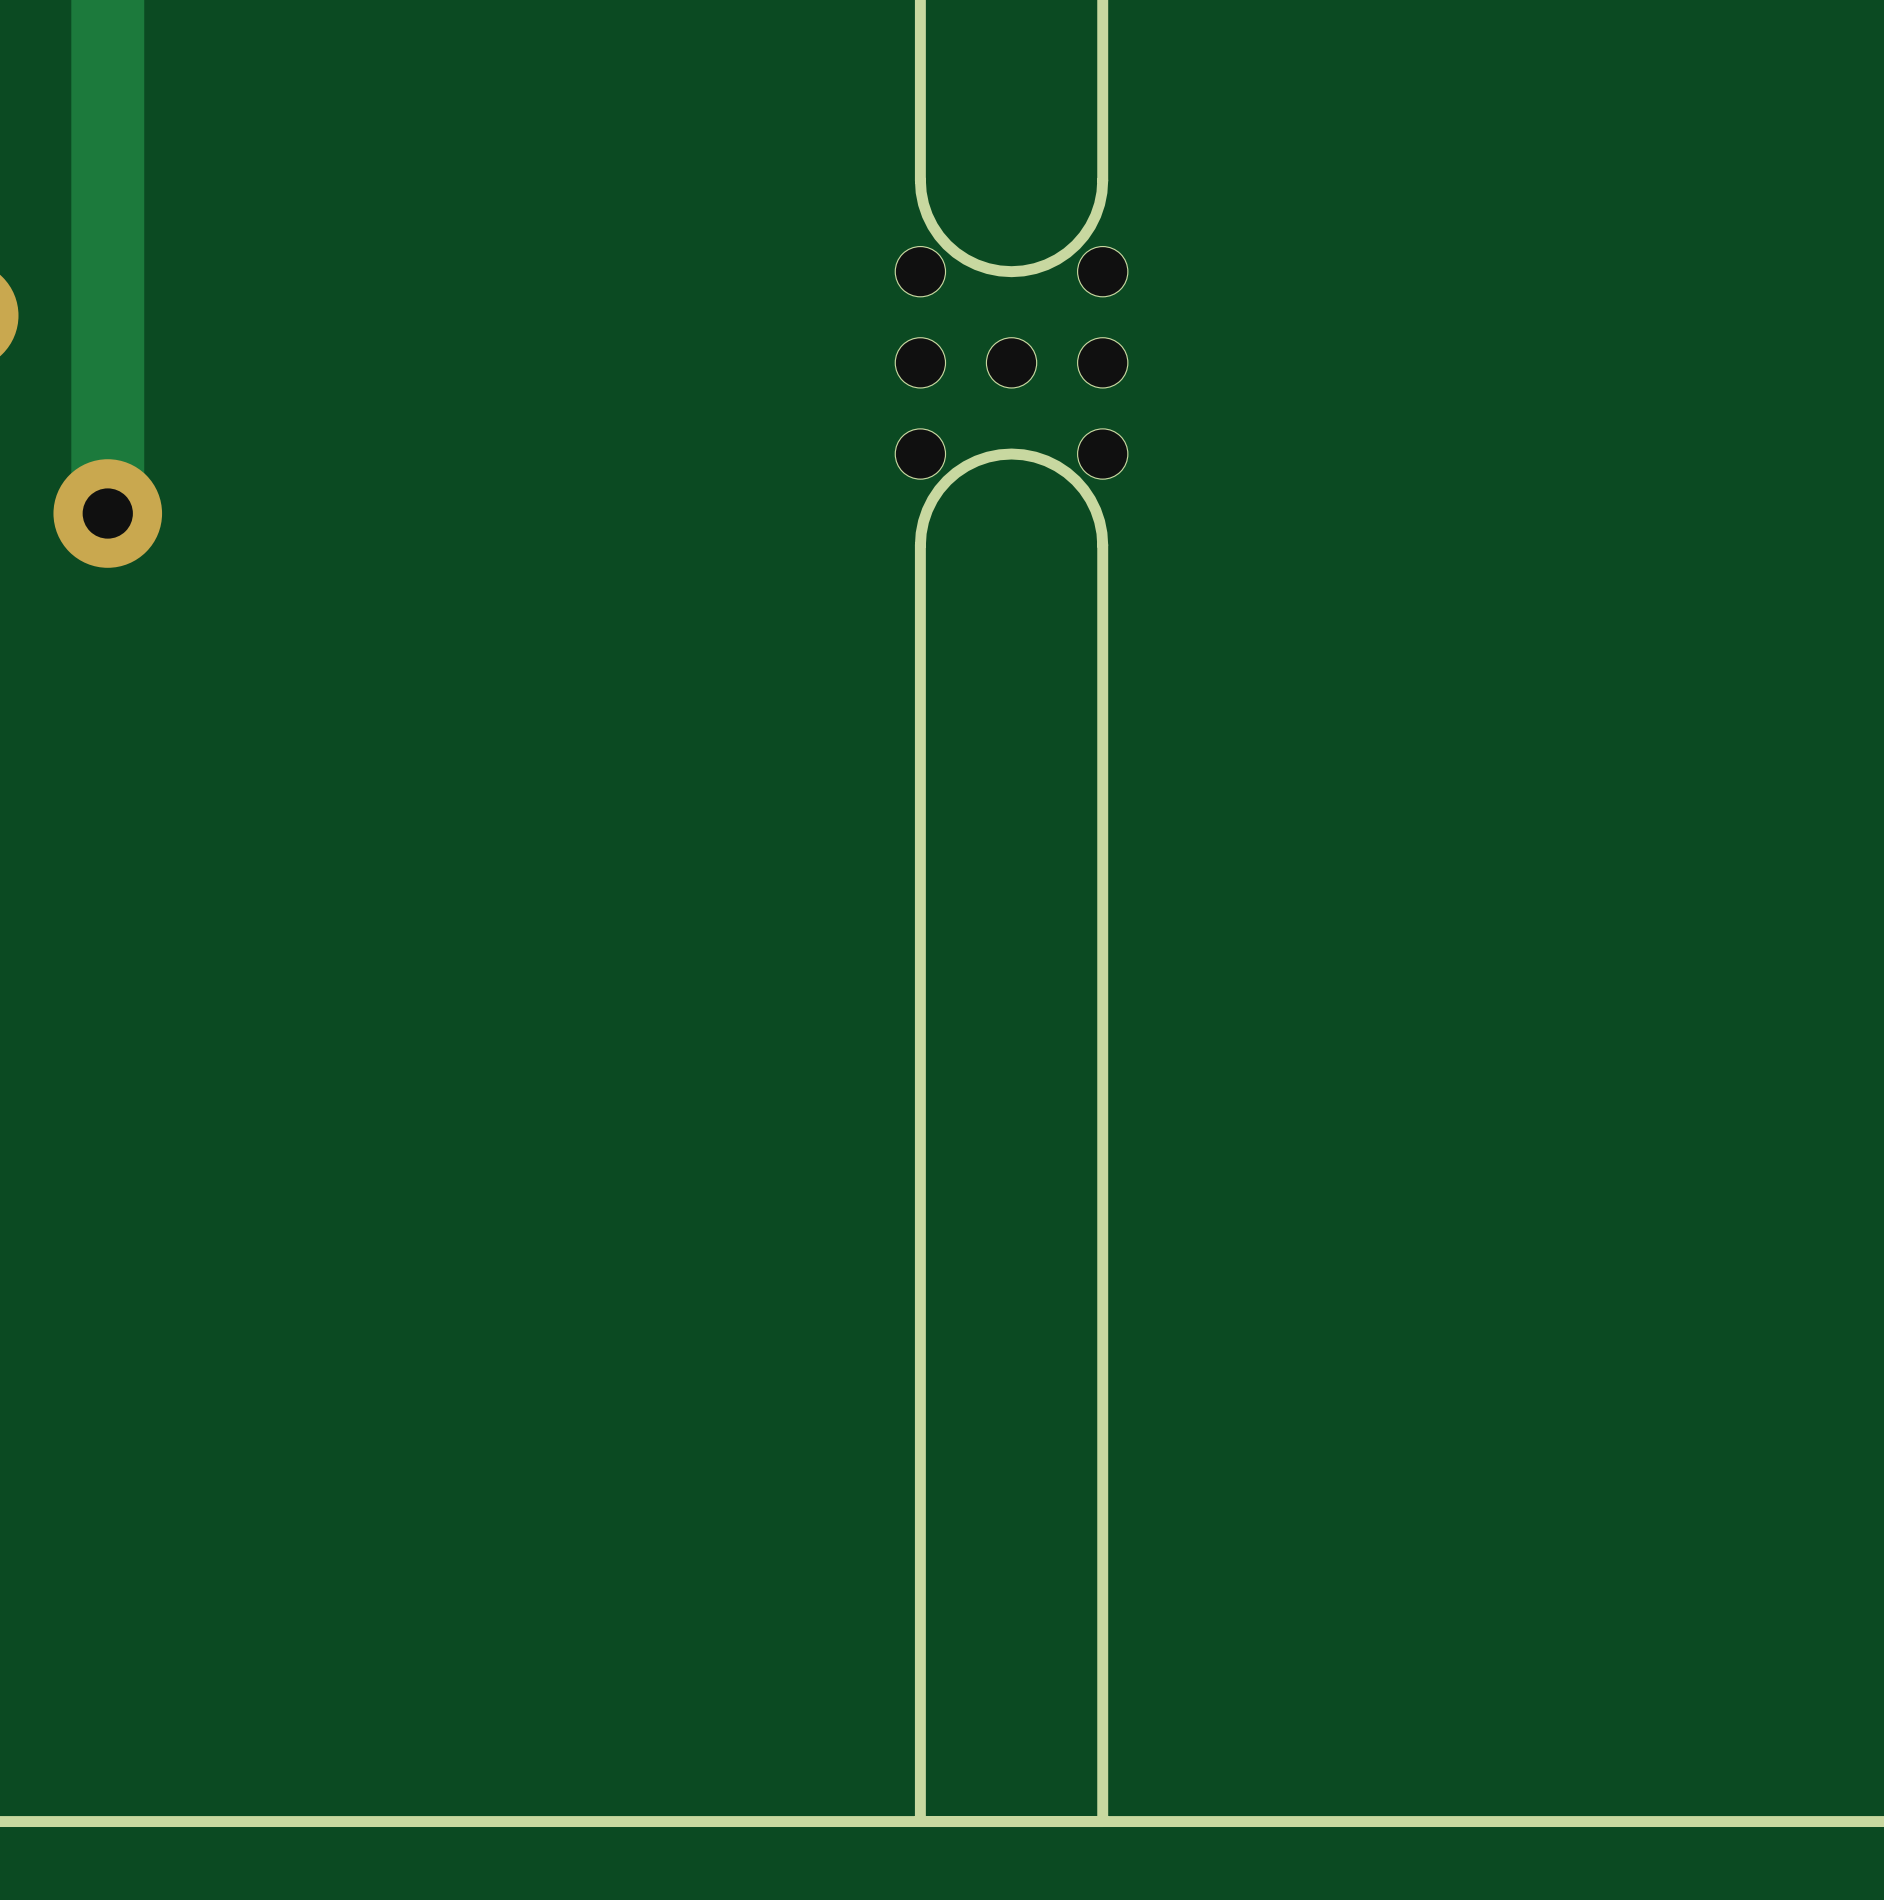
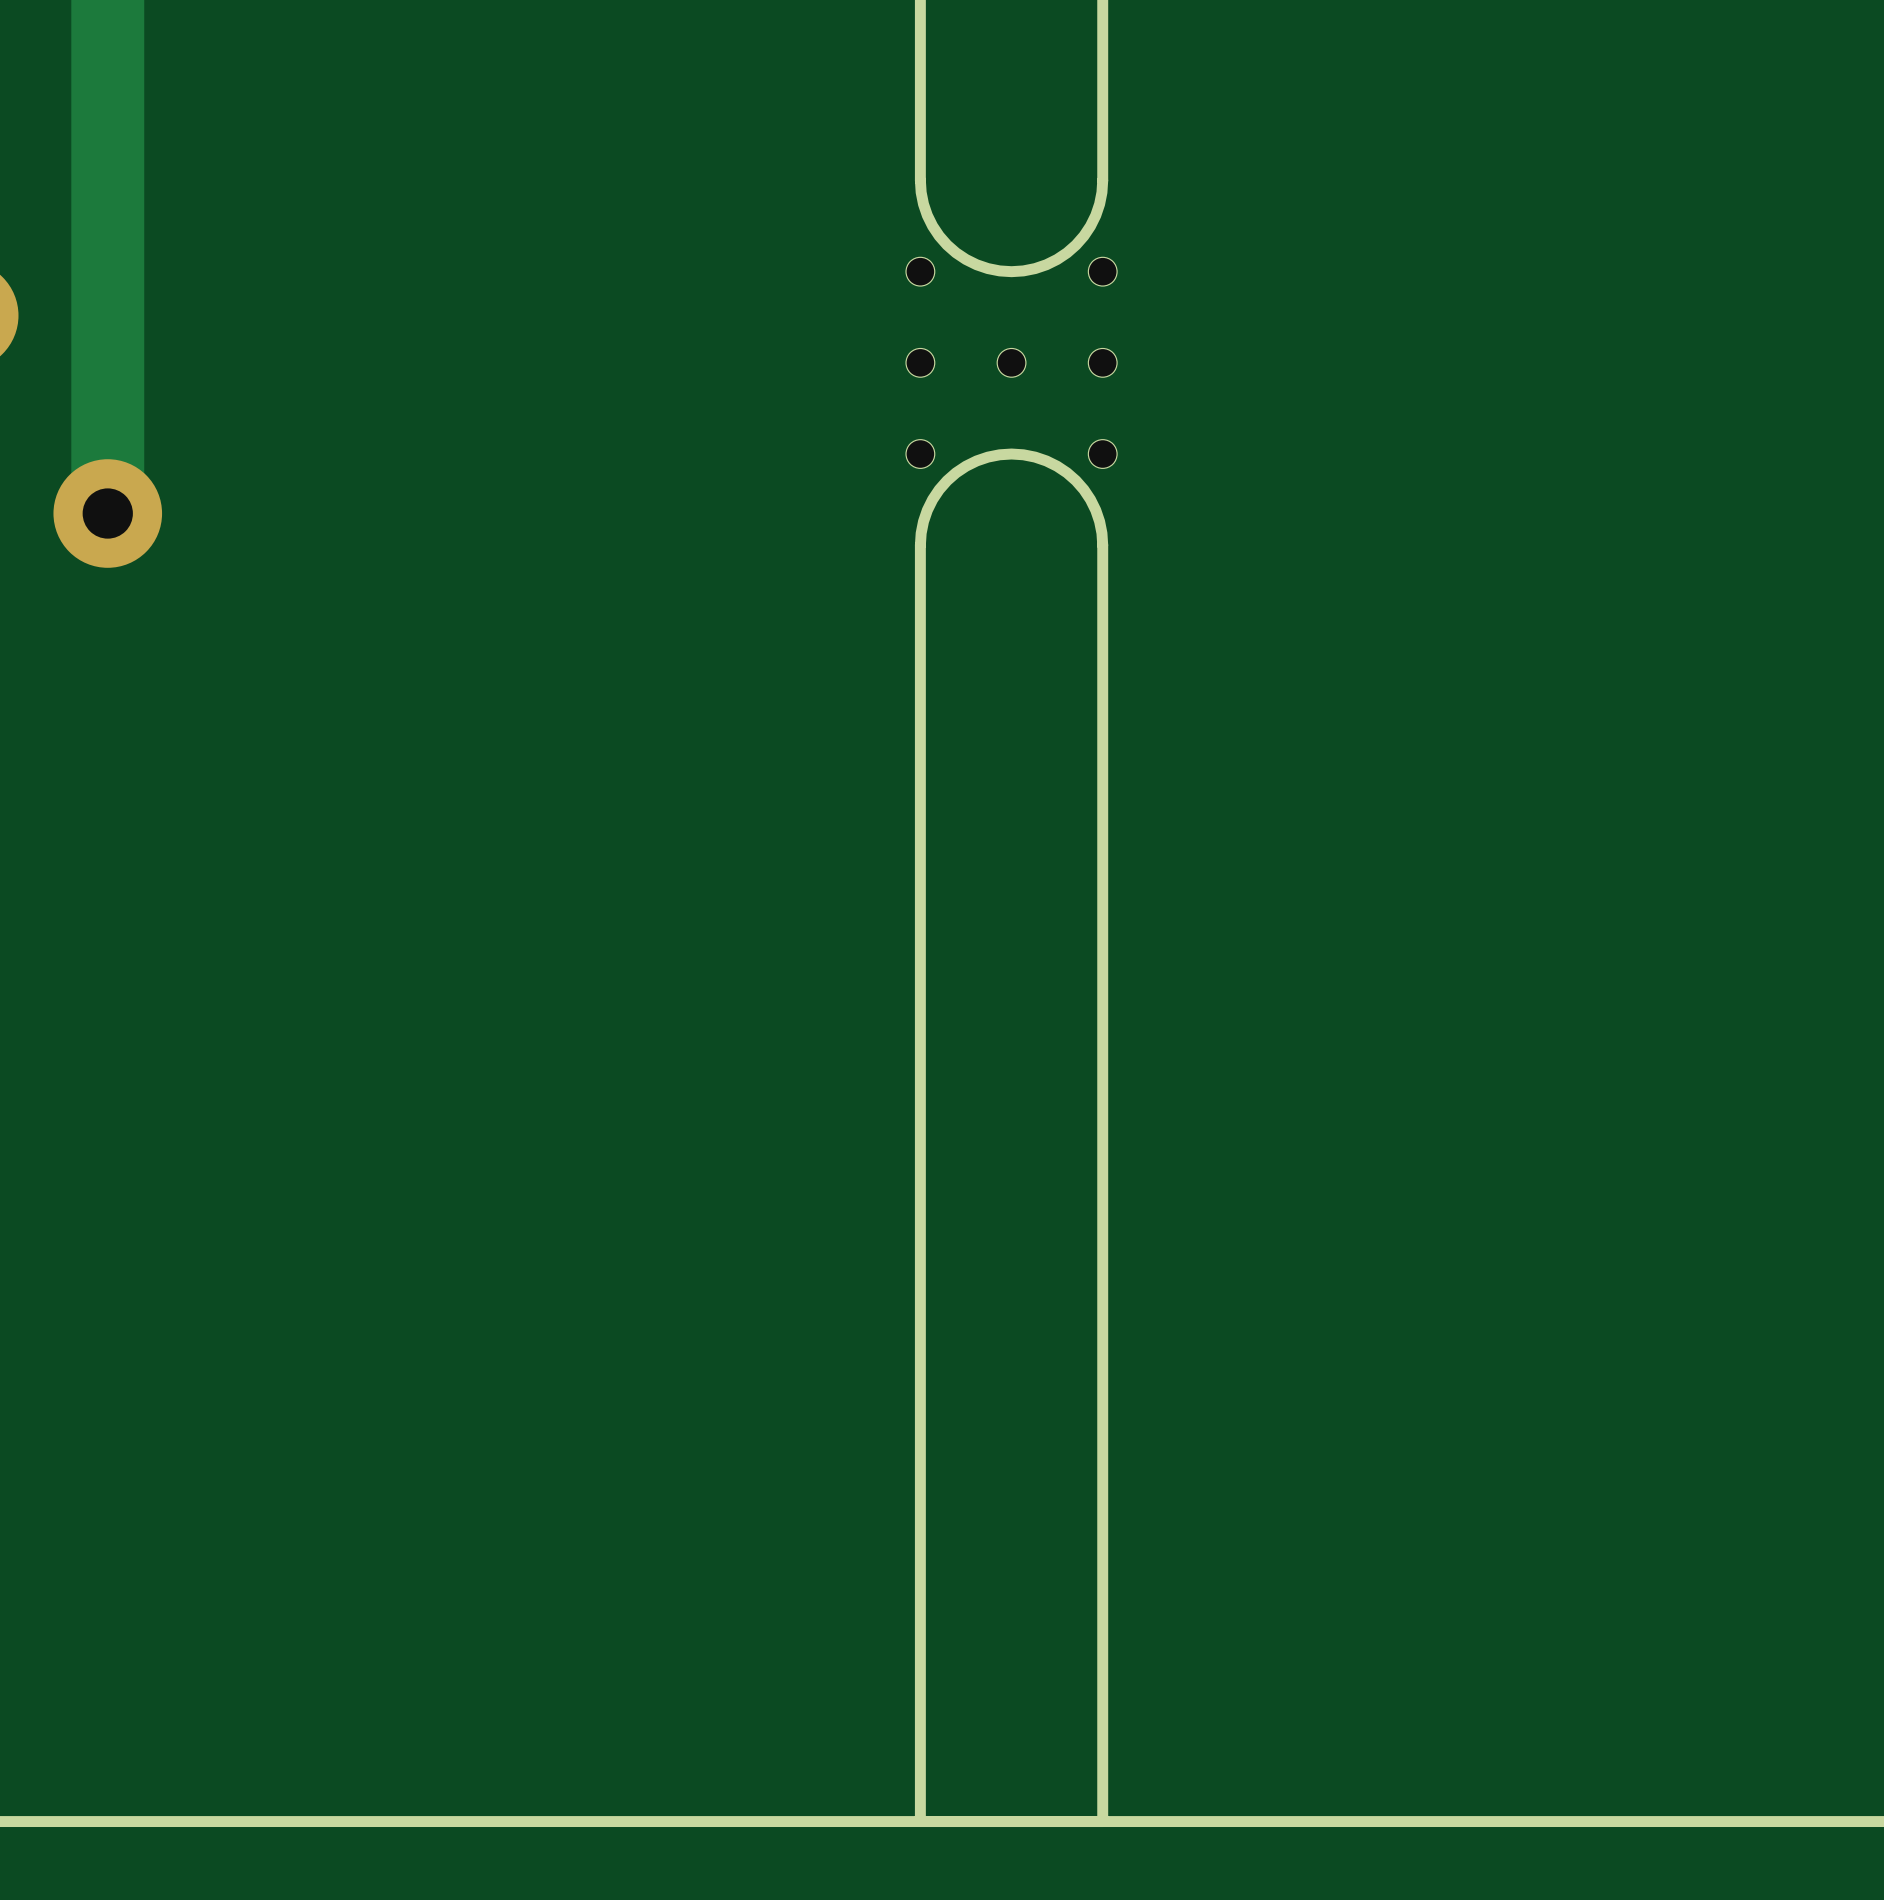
hole size: [895, 246, 946, 297] -> [906, 257, 935, 287]
hole size: [1077, 246, 1128, 297] -> [1088, 257, 1118, 287]
hole size: [895, 337, 946, 388] -> [906, 348, 935, 378]
hole size: [986, 337, 1037, 388] -> [997, 348, 1026, 378]
hole size: [1077, 337, 1128, 388] -> [1088, 348, 1118, 378]
hole size: [895, 428, 946, 480] -> [906, 439, 935, 469]
hole size: [1077, 428, 1128, 480] -> [1088, 439, 1118, 469]

